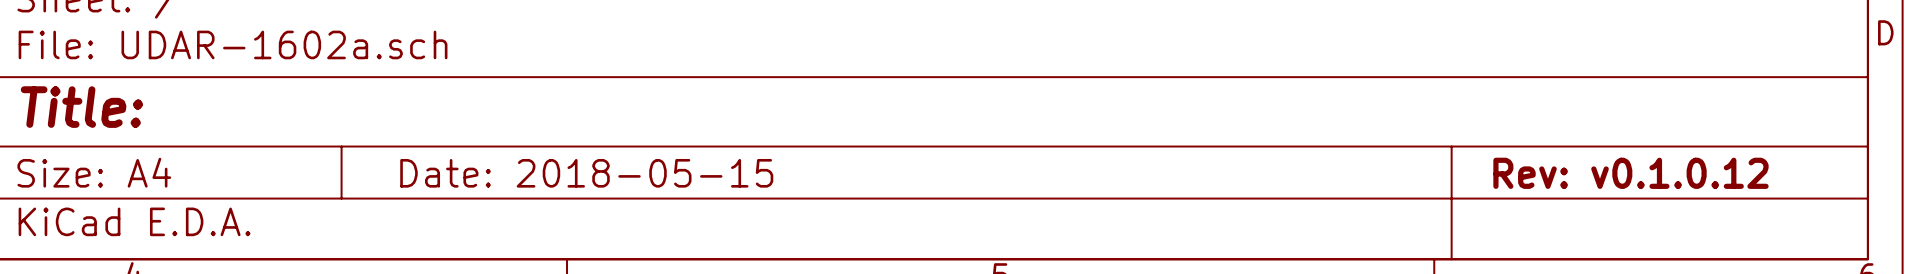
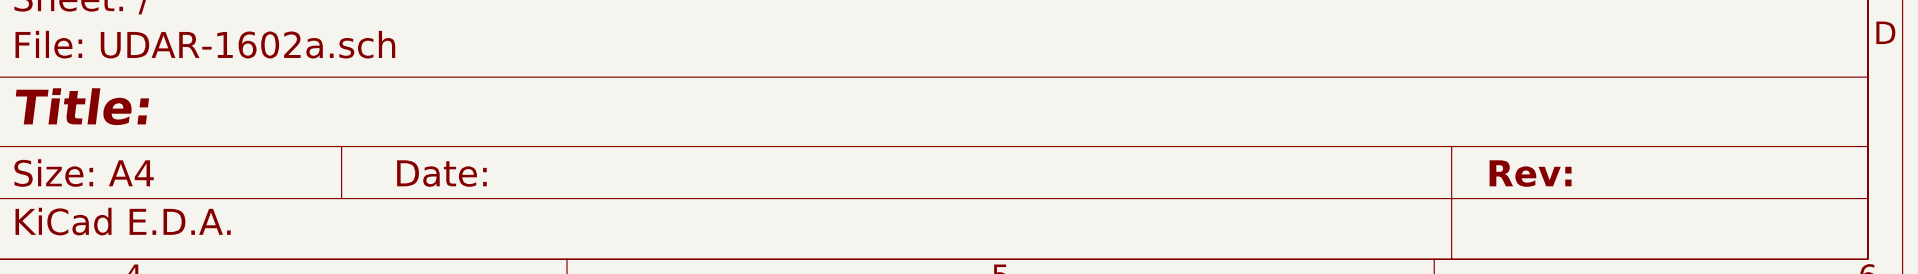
title block: Date: 2018-05-15 (586, 173) -> Date: (441, 173)
title block: Rev: v0.1.0.12 (1630, 173) -> Rev: (1530, 173)

